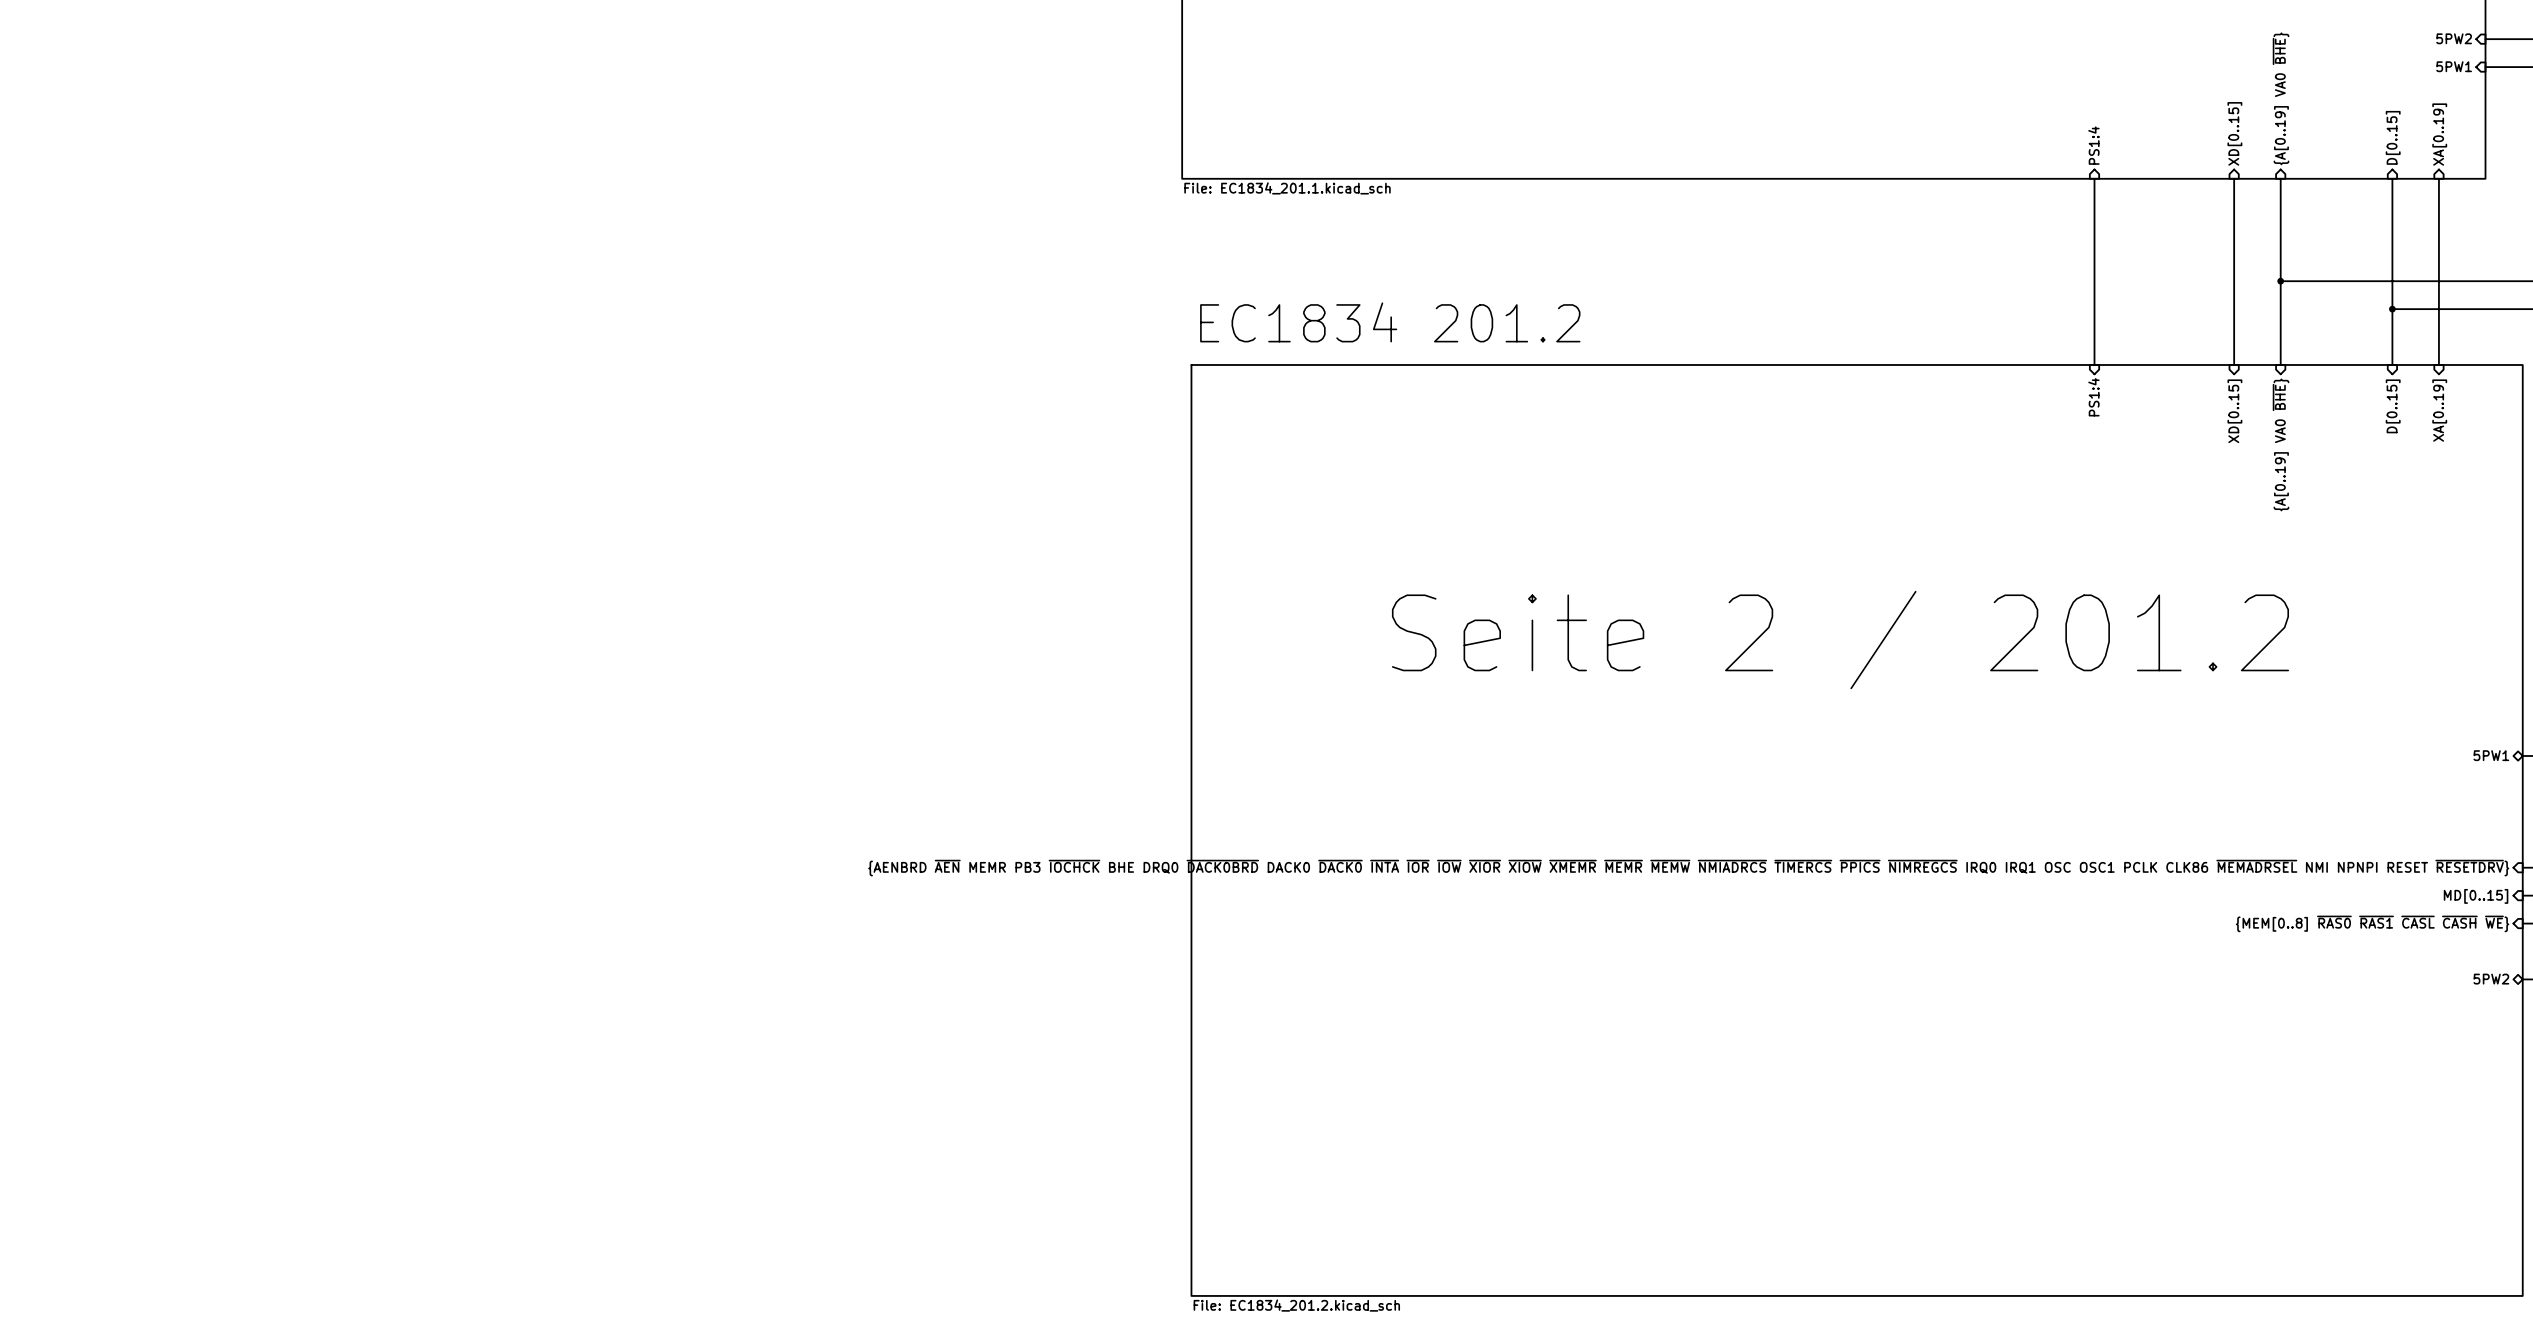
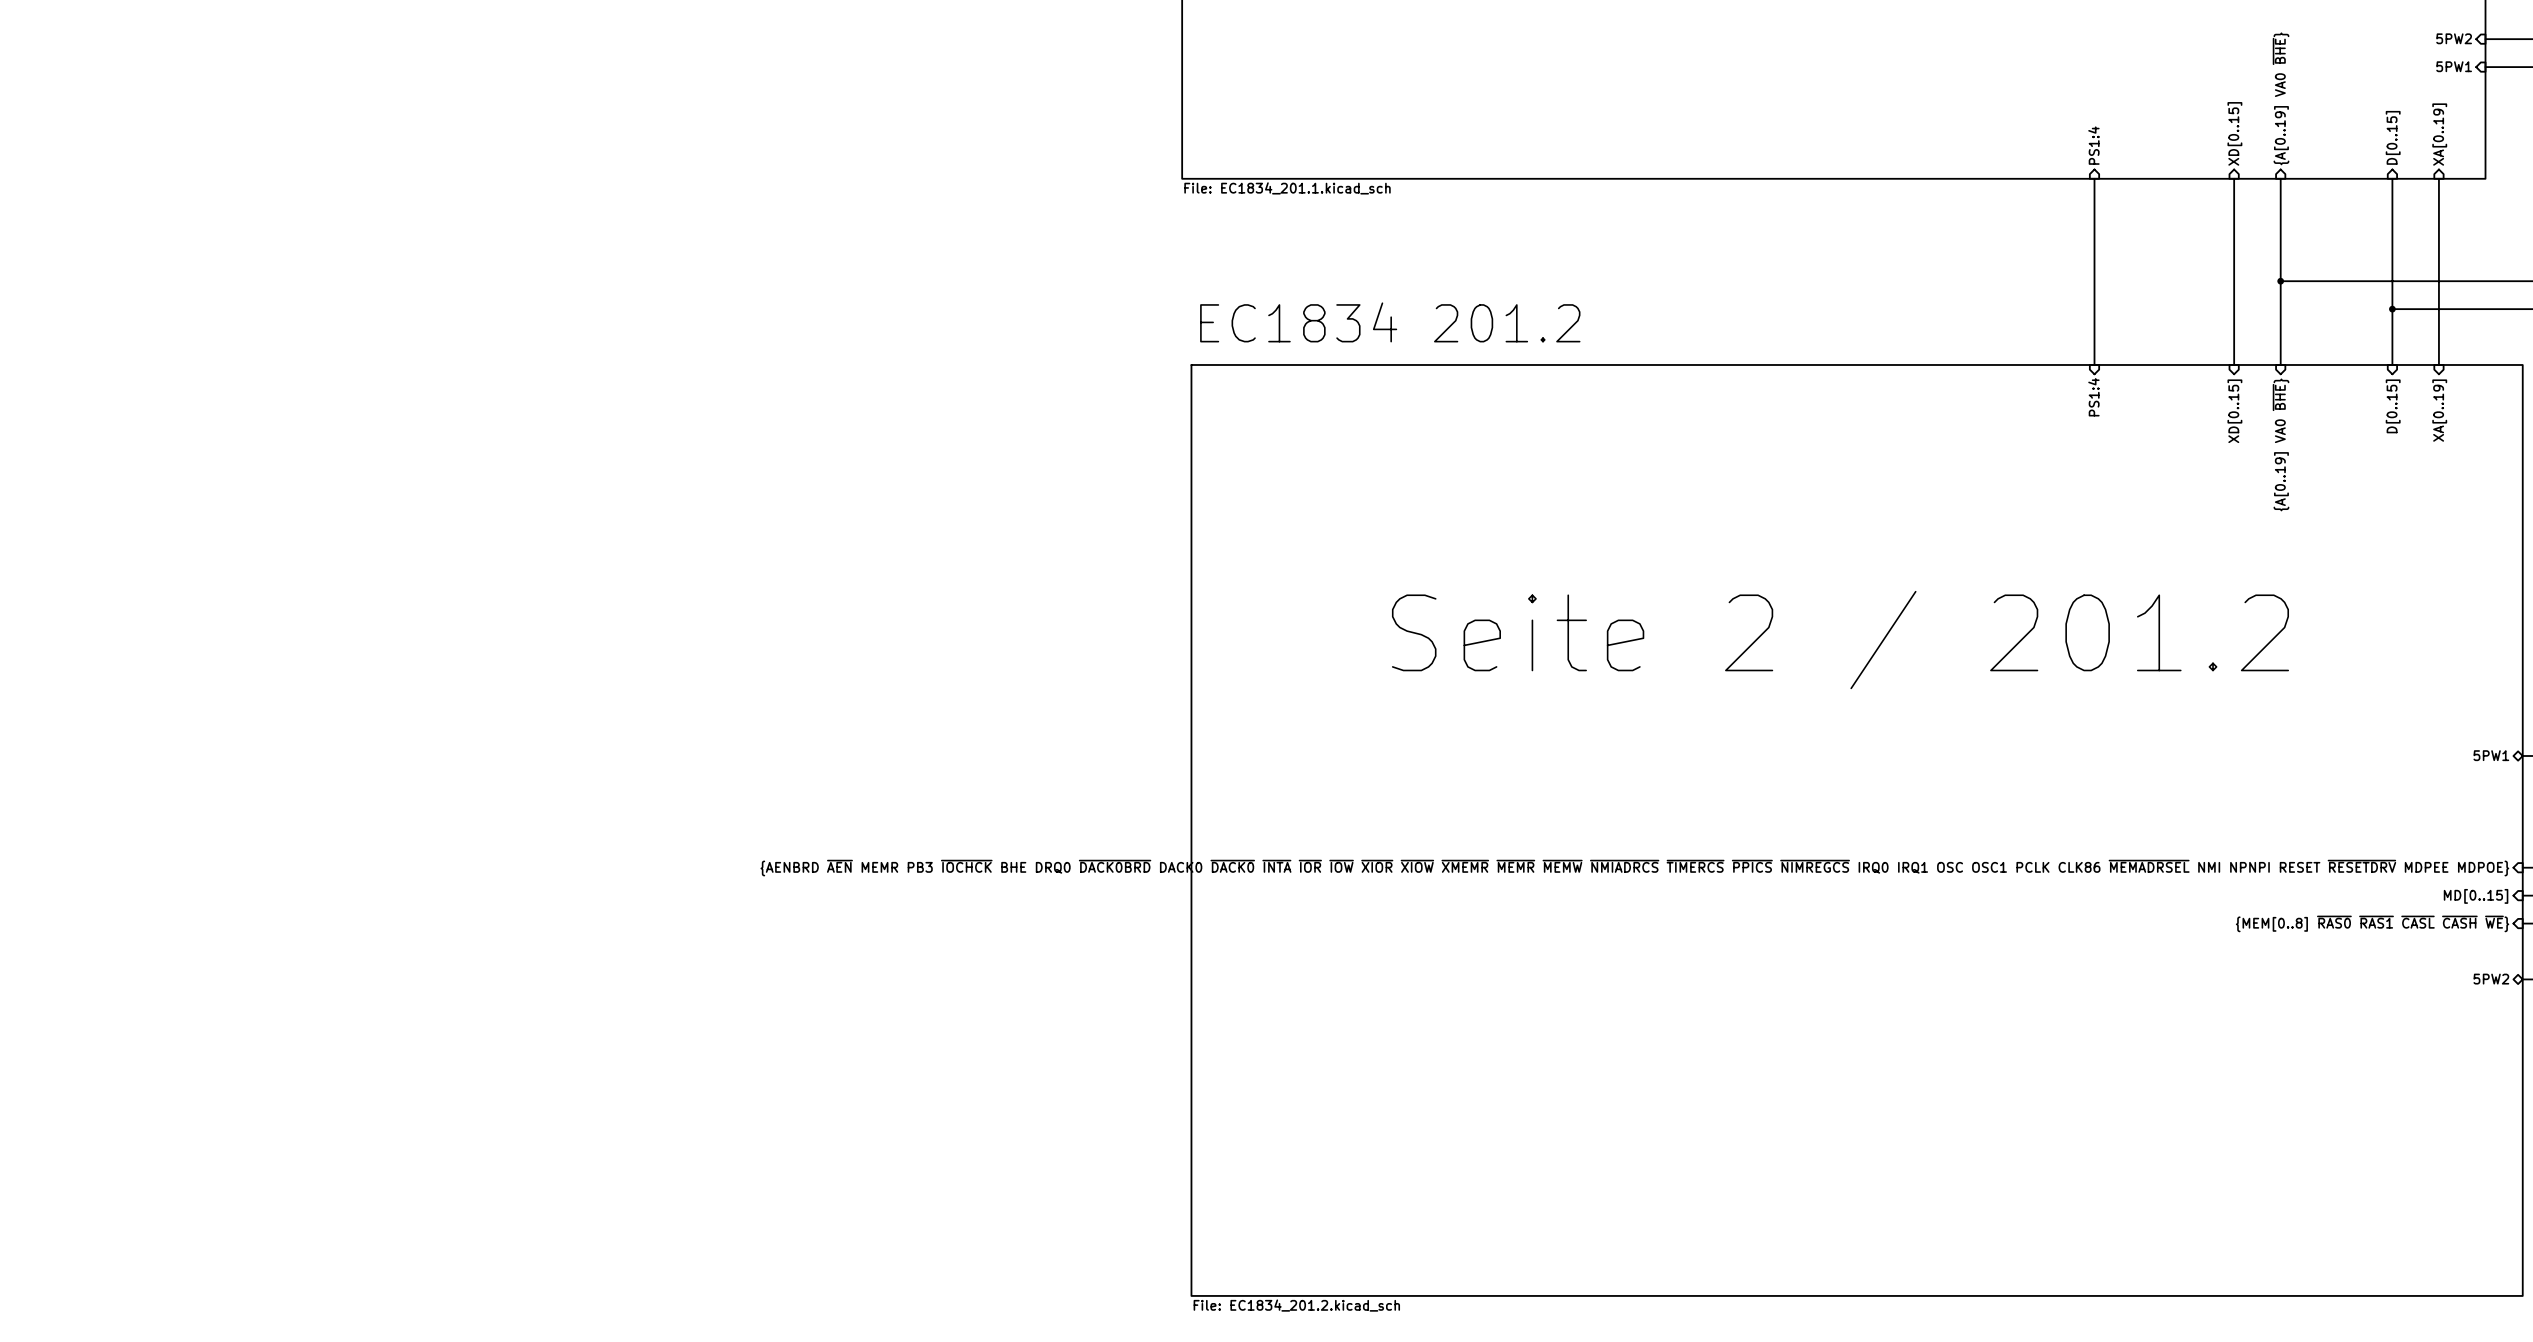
sheet pin: {AENBRD ~{AEN} MEMR PB3 ~{IOCHCK} BHE DRQ0 ~{DACK0BRD} DACK0 ~{DACK0} ~{INTA} ~{IOR} ~{IOW} ~{XIOR} ~{XIOW} ~{XMEMR} ~{MEMR} ~{MEMW} ~{NMIADRCS} ~{TIMERCS} ~{PPICS} ~{NIMREGCS} IRQ0 IRQ1 OSC OSC1 PCLK CLK86 ~{MEMADRSEL} NMI NPNPI RESET ~{RESETDRV}} (1688, 868) -> {AENBRD ~{AEN} MEMR PB3 ~{IOCHCK} BHE DRQ0 ~{DACK0BRD} DACK0 ~{DACK0} ~{INTA} ~{IOR} ~{IOW} ~{XIOR} ~{XIOW} ~{XMEMR} ~{MEMR} ~{MEMW} ~{NMIADRCS} ~{TIMERCS} ~{PPICS} ~{NIMREGCS} IRQ0 IRQ1 OSC OSC1 PCLK CLK86 ~{MEMADRSEL} NMI NPNPI RESET ~{RESETDRV} MDPEE MDPOE} (1634, 868)

